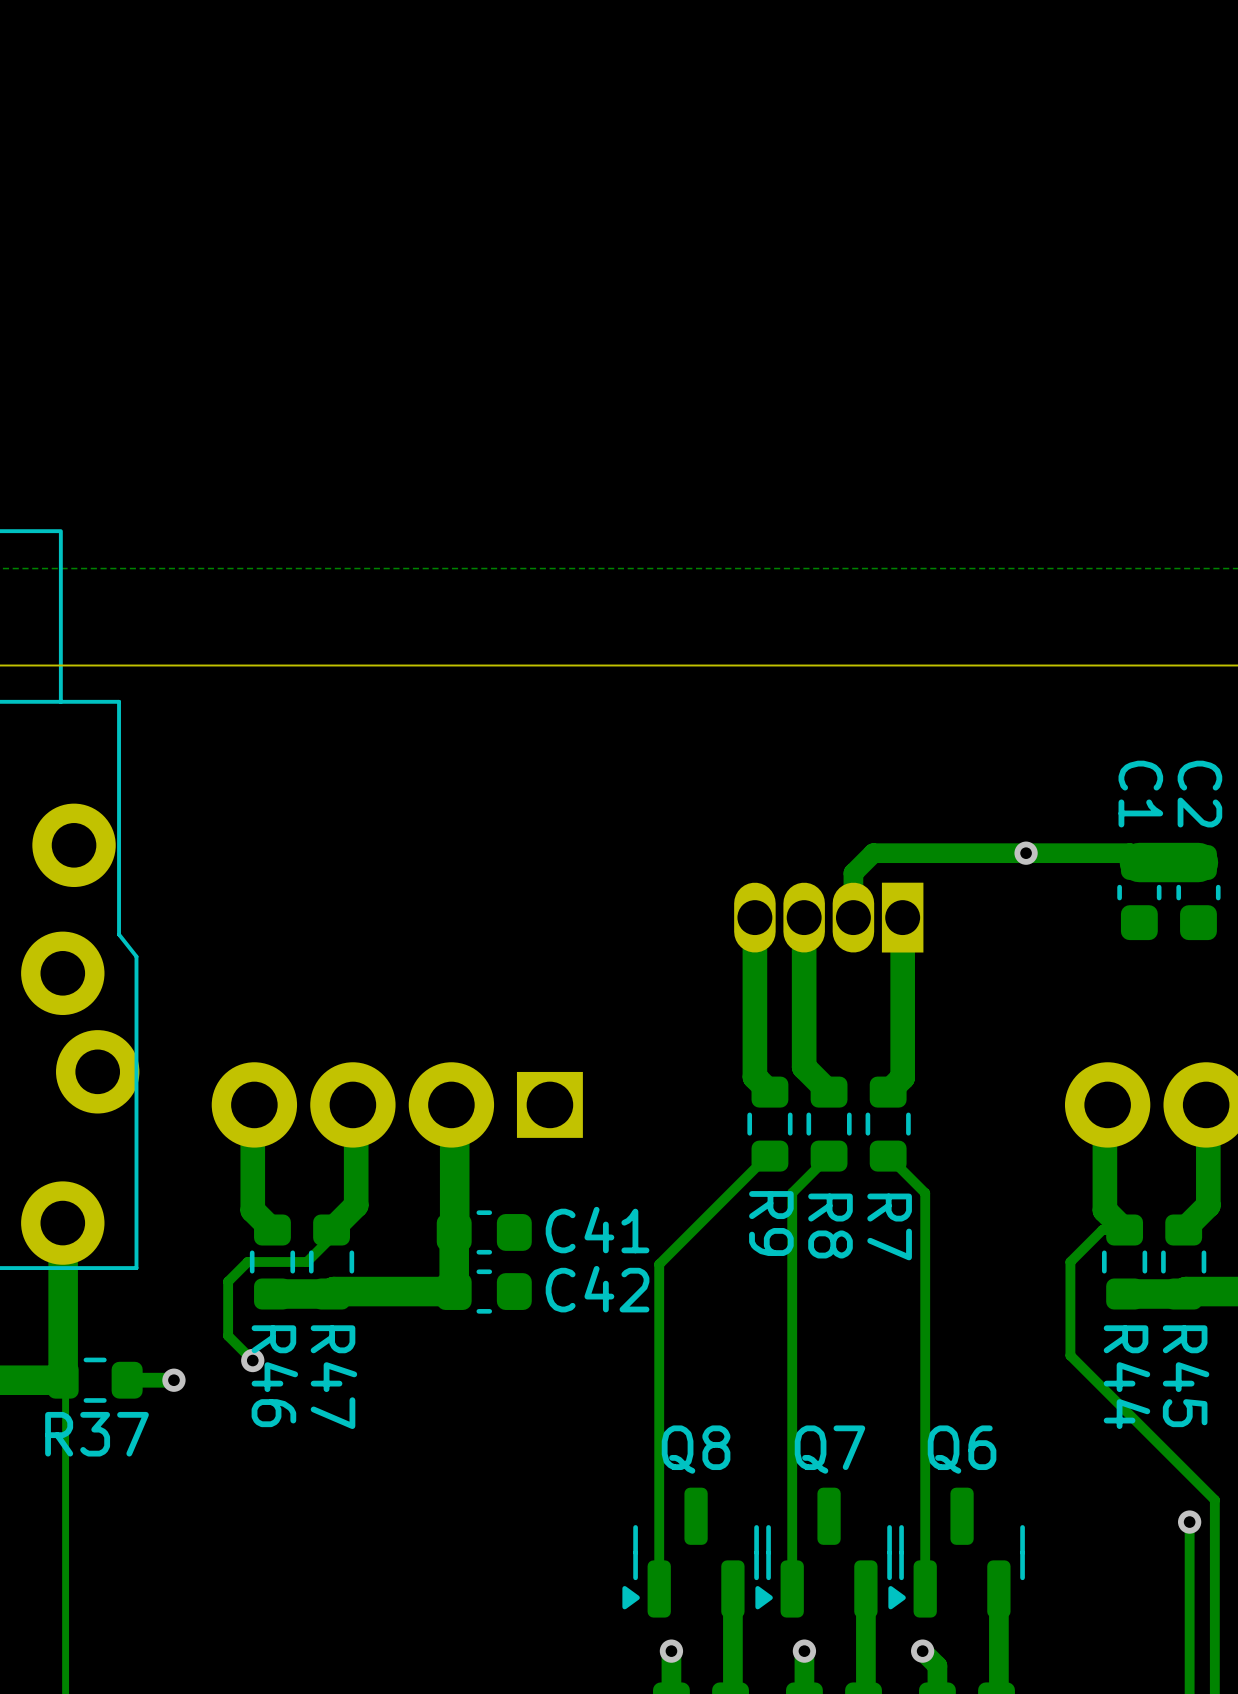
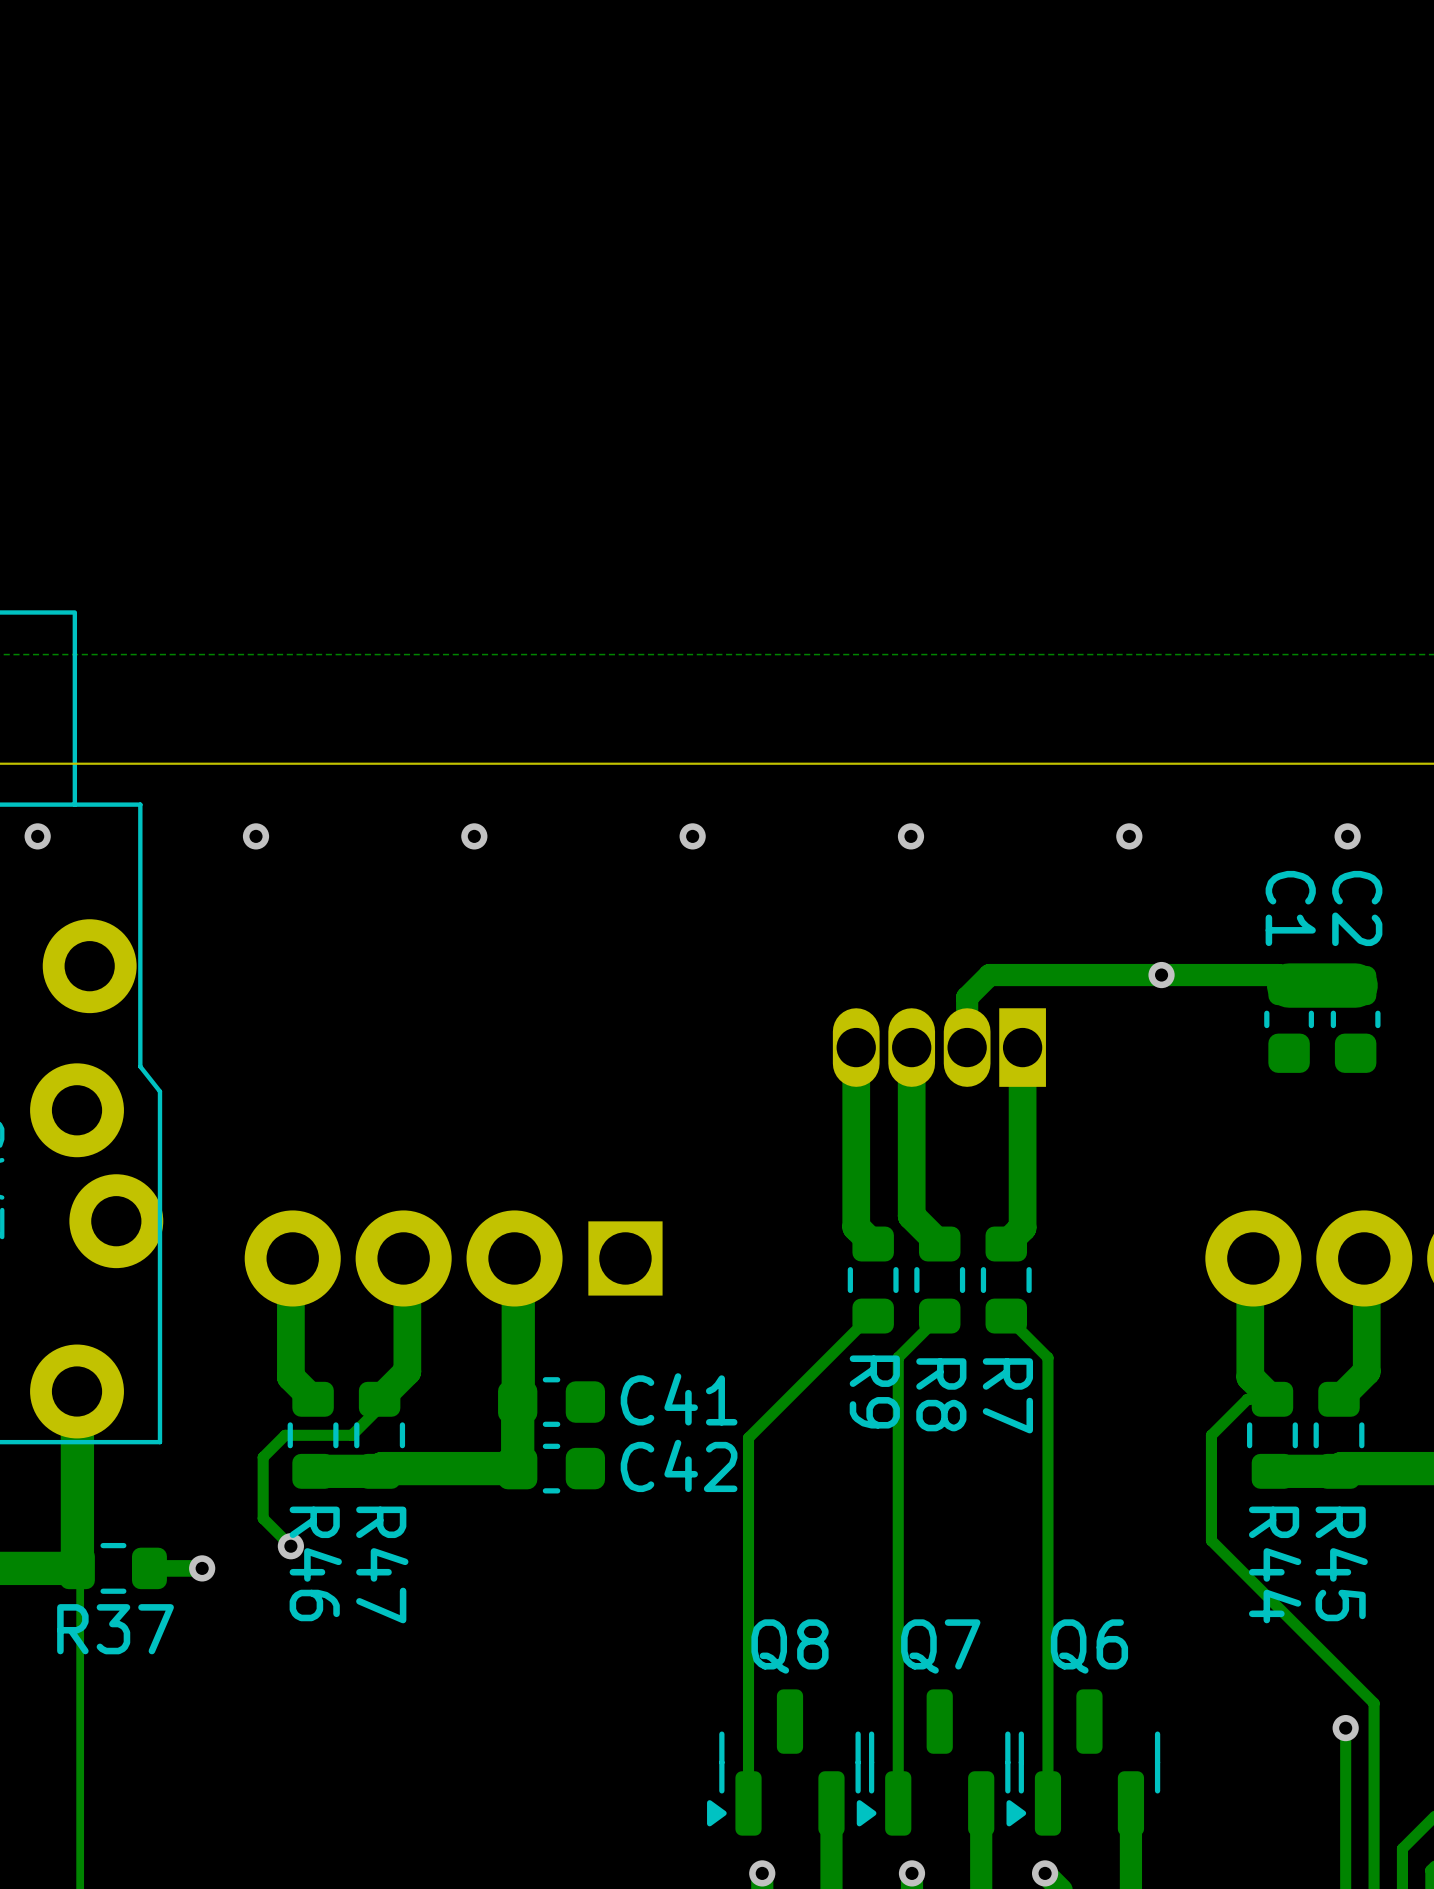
via: none -> (37, 836)
via: none -> (256, 836)
via: none -> (474, 836)
via: none -> (692, 836)
via: none -> (910, 836)
via: none -> (1129, 836)
via: none -> (1347, 836)

